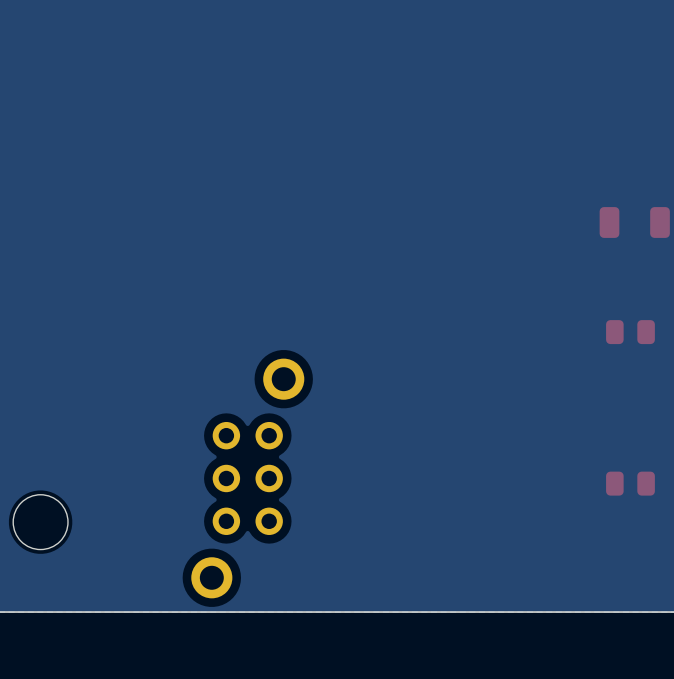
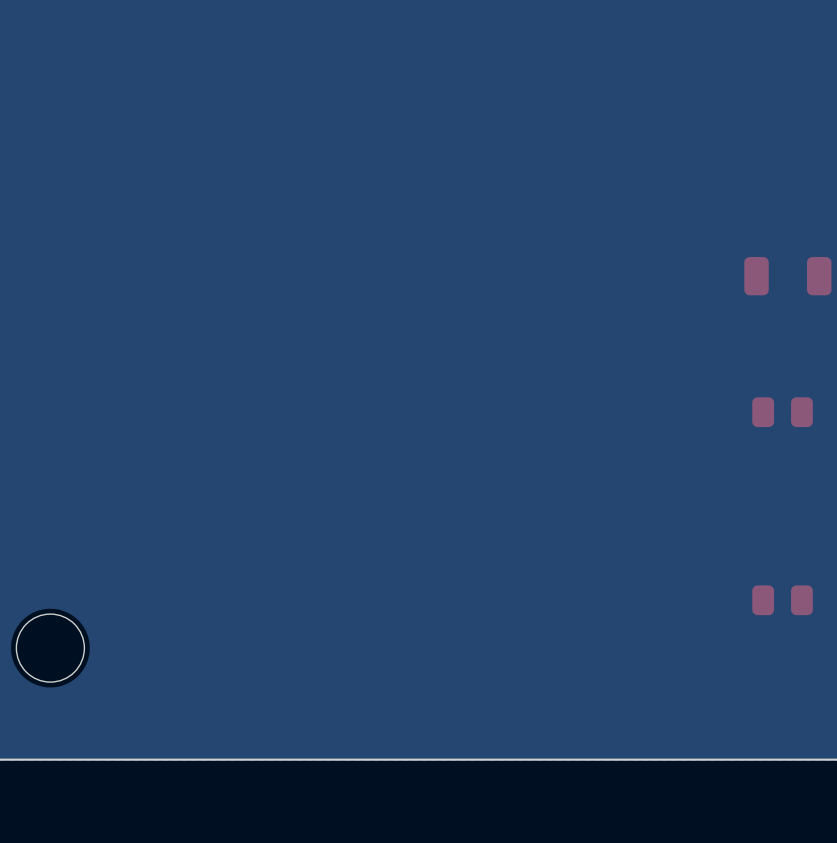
part: (247, 478) -> none

